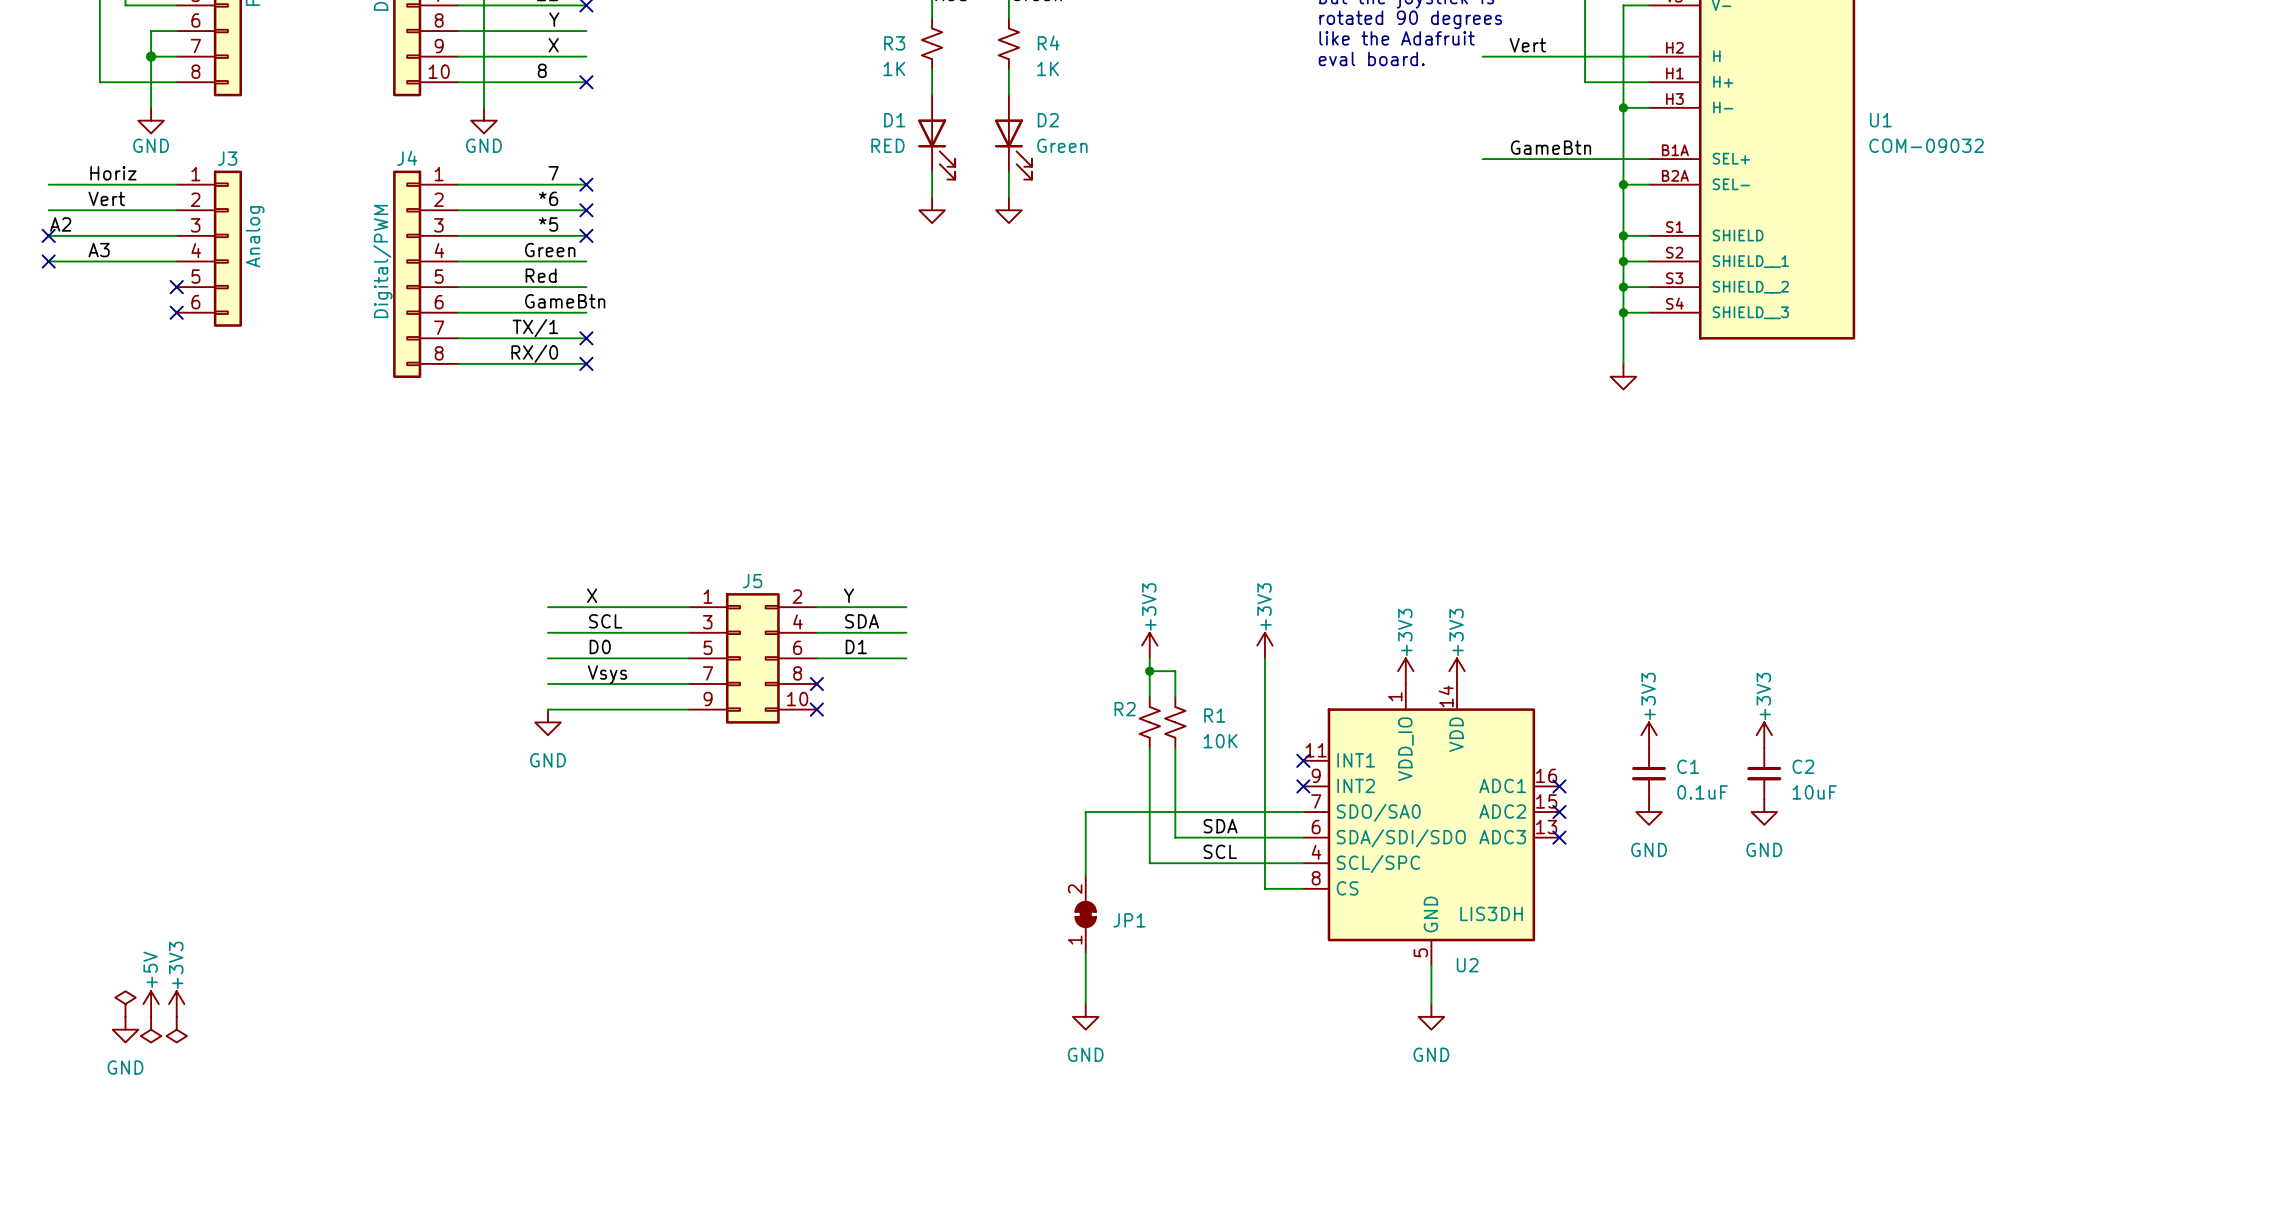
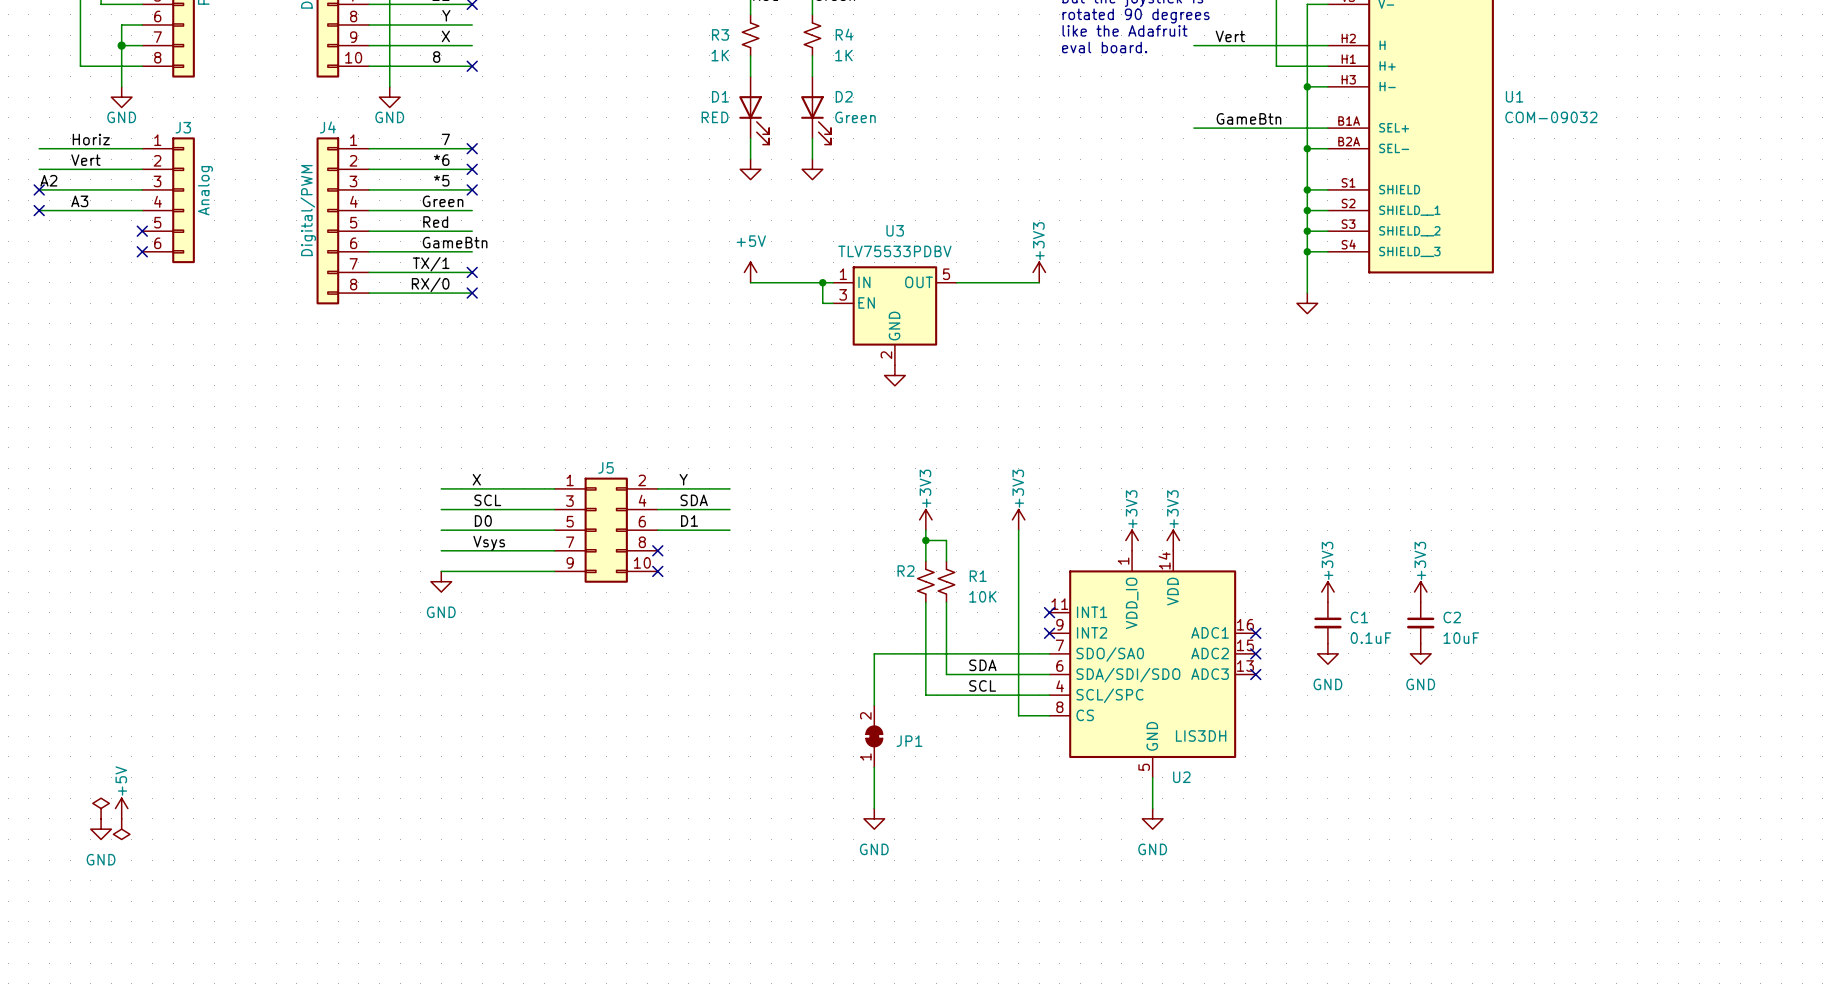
power symbol: none -> +5V (750, 272)
power symbol: none -> +3V3 (1039, 272)
wire: none -> (750, 282) (833, 282)
wire: none -> (822, 282) (822, 303) (833, 303)
junction: none -> (822, 282)
wire: none -> (956, 282) (1039, 282)
U3: none -> TLV75533PDBV (894, 315)
power symbol: none -> (894, 375)
power symbol: +3V3 (176, 1004) -> none
power symbol: (176, 1029) -> none

